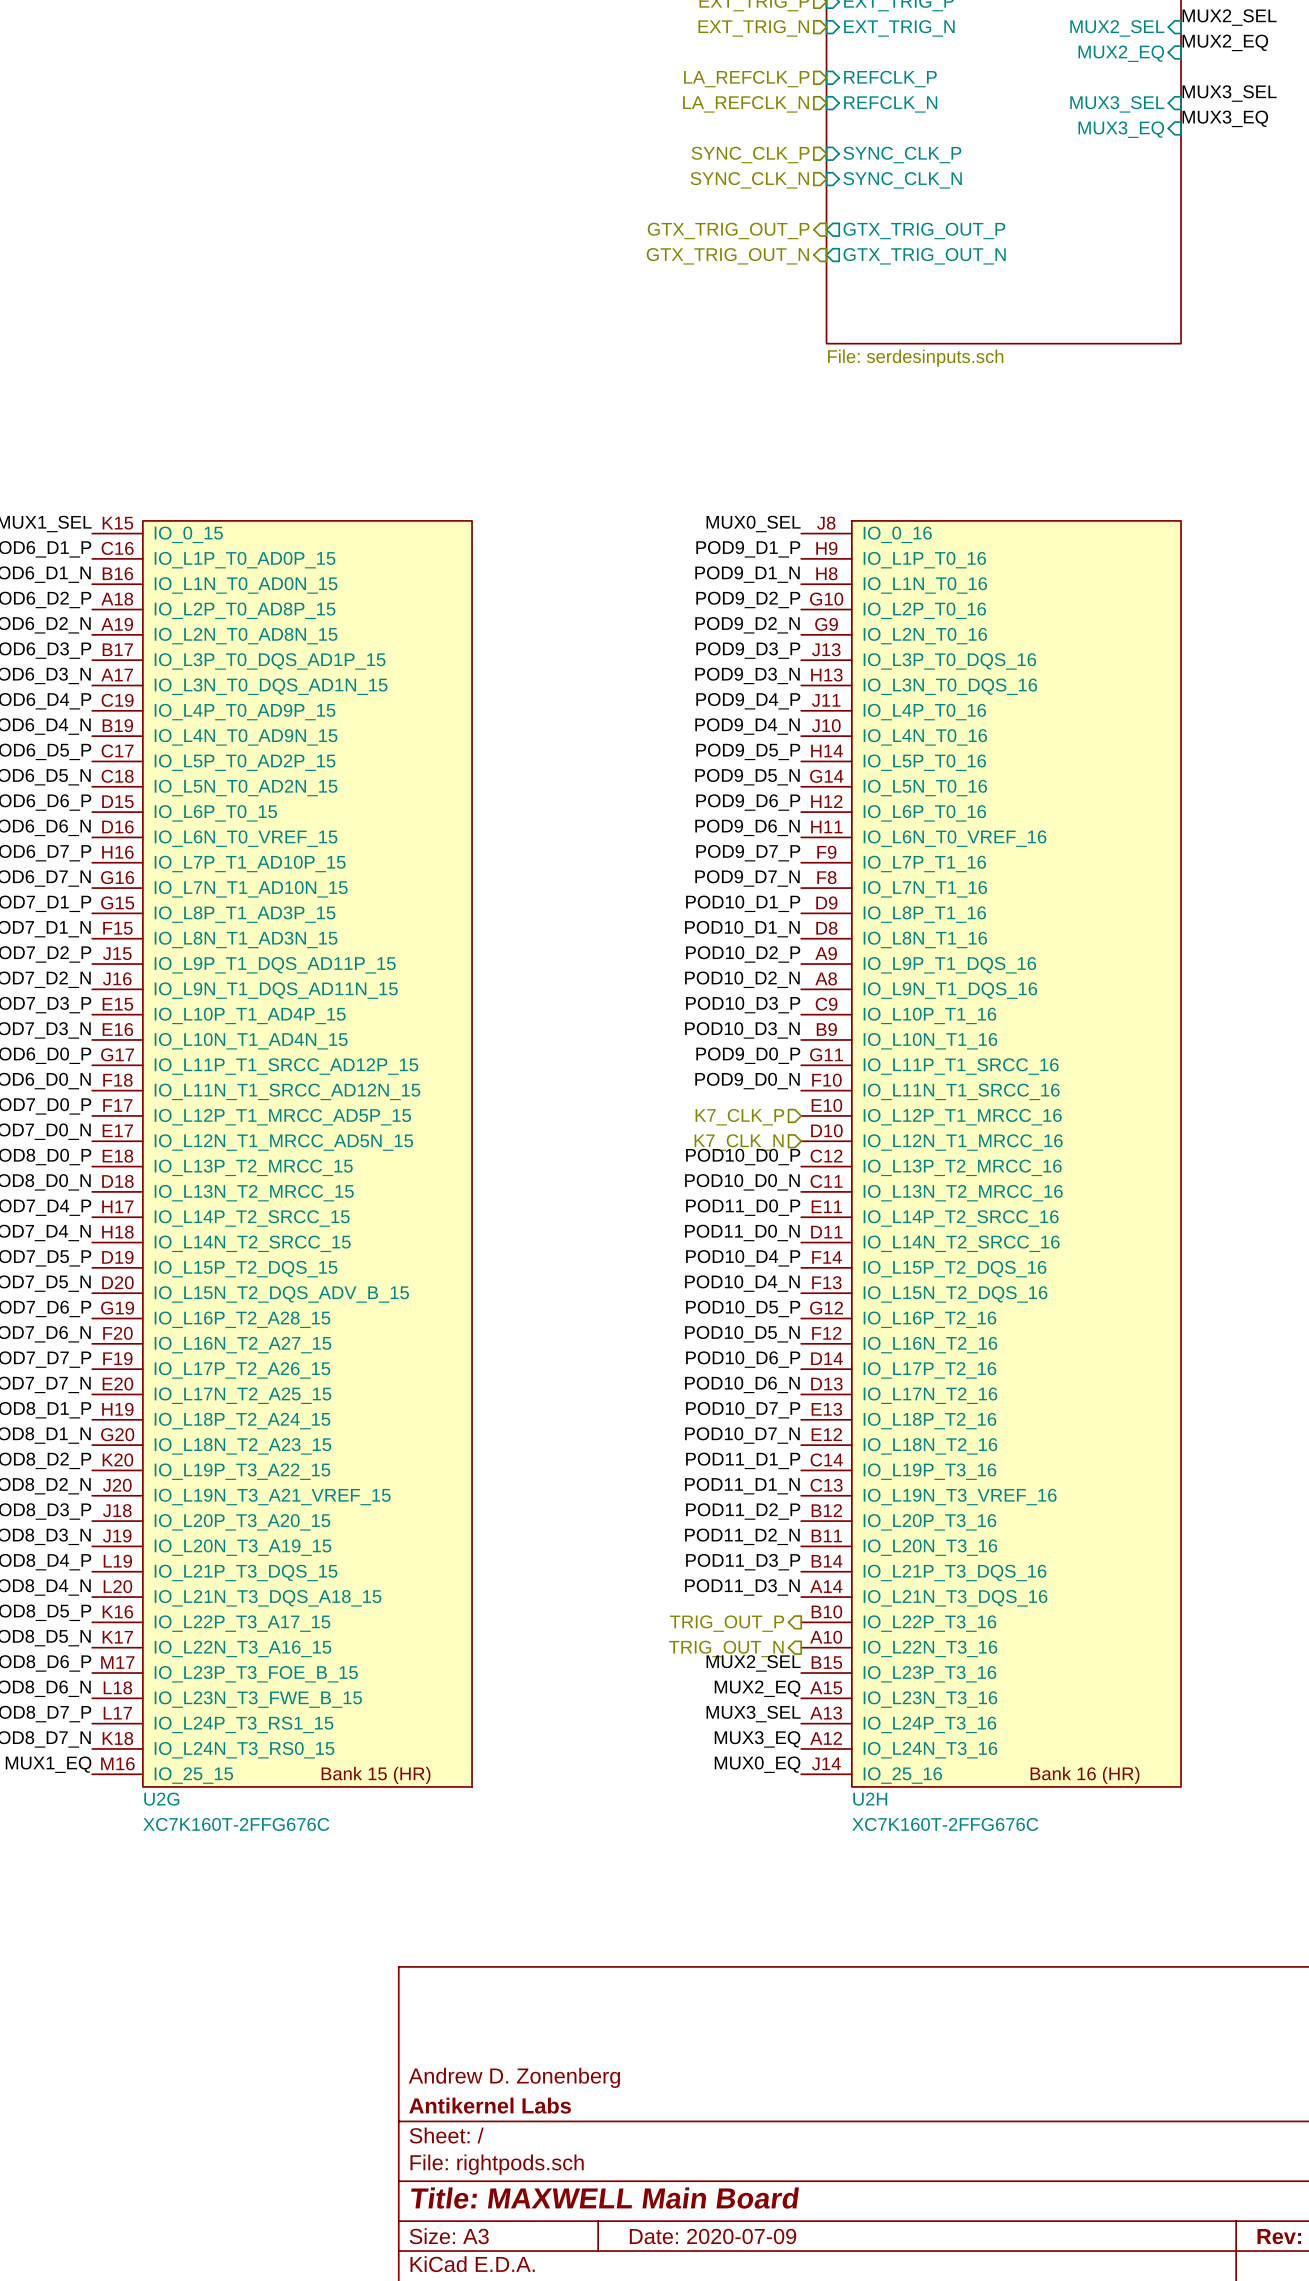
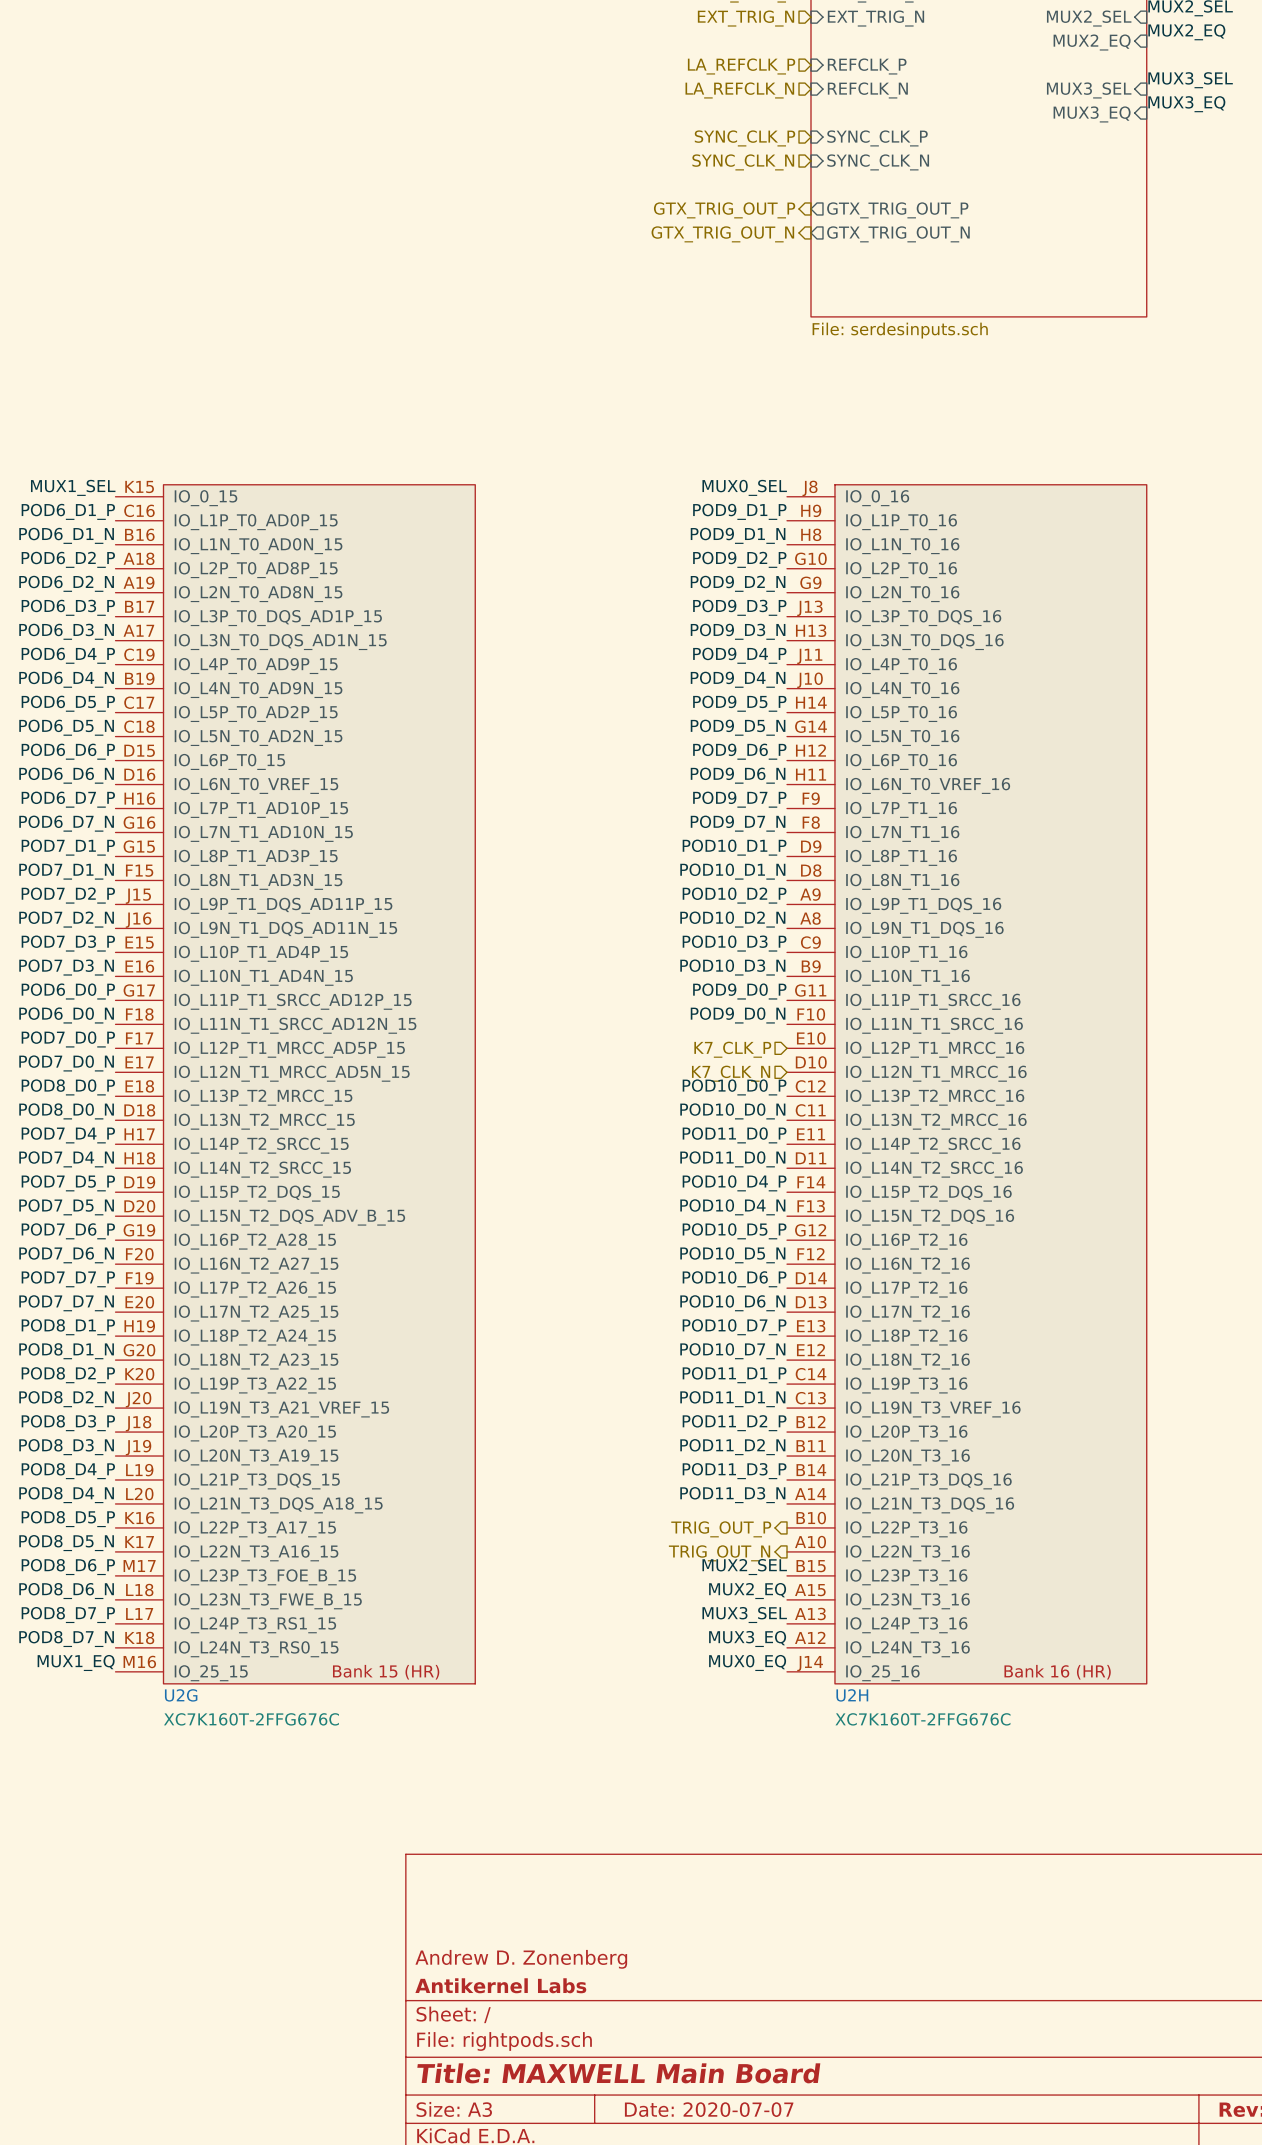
title block: Date: 2020-07-09 (713, 2236) -> Date: 2020-07-07 (709, 2109)

